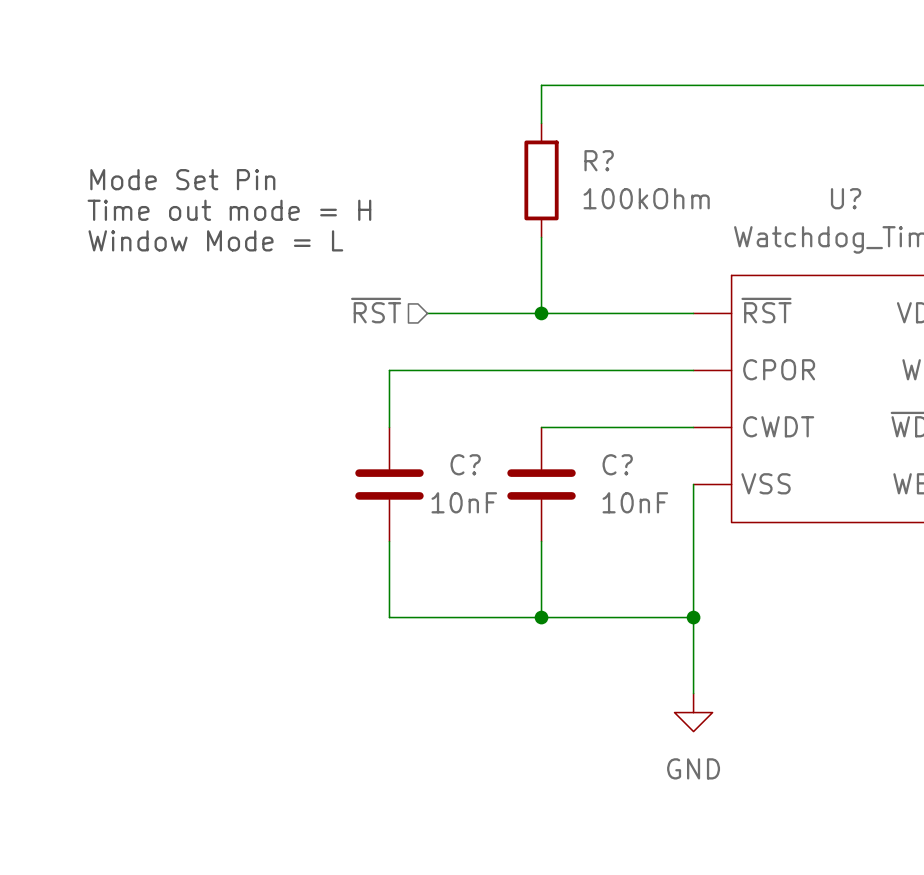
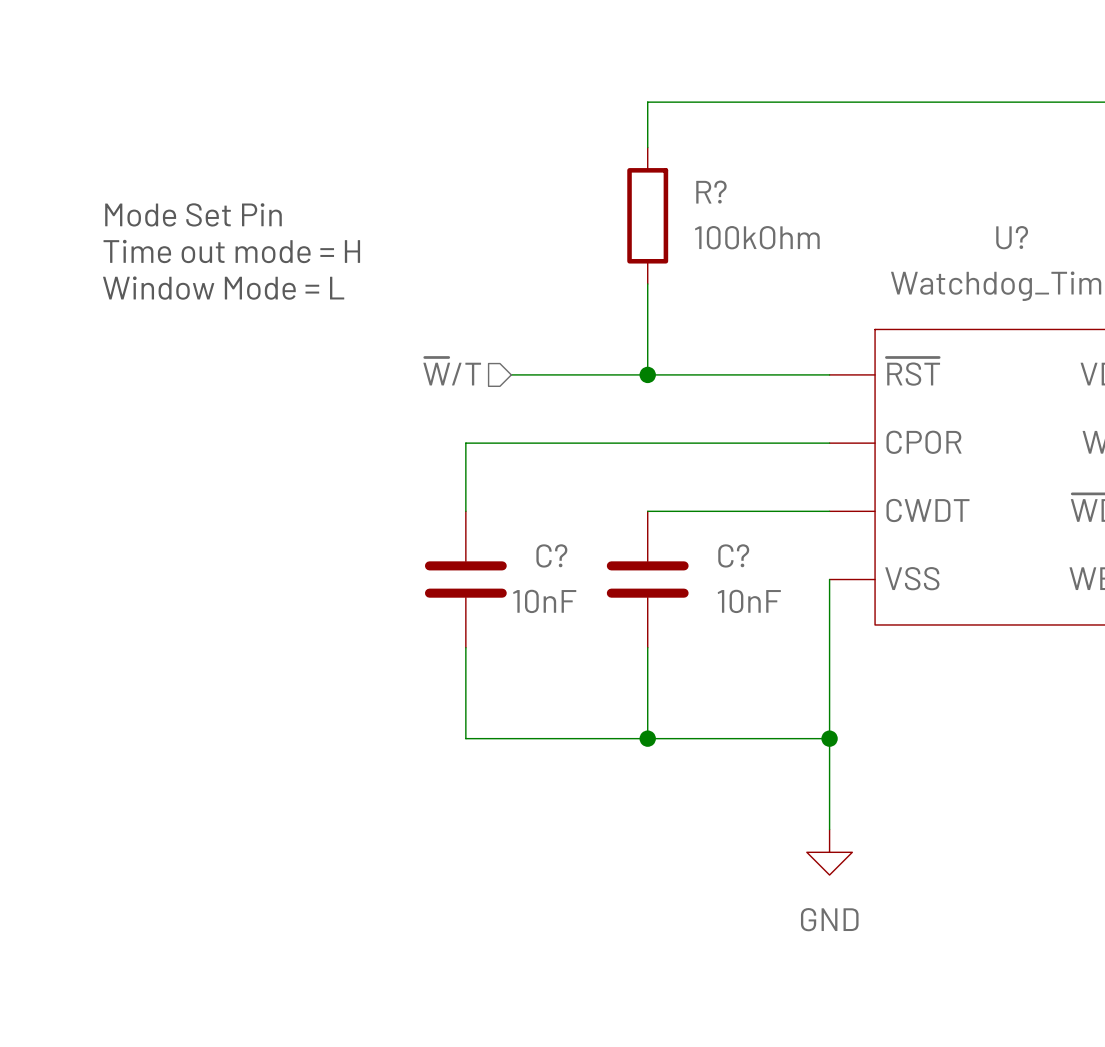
hierarchical label: ~{RST} (376, 310) -> ~{W}/T (452, 371)

